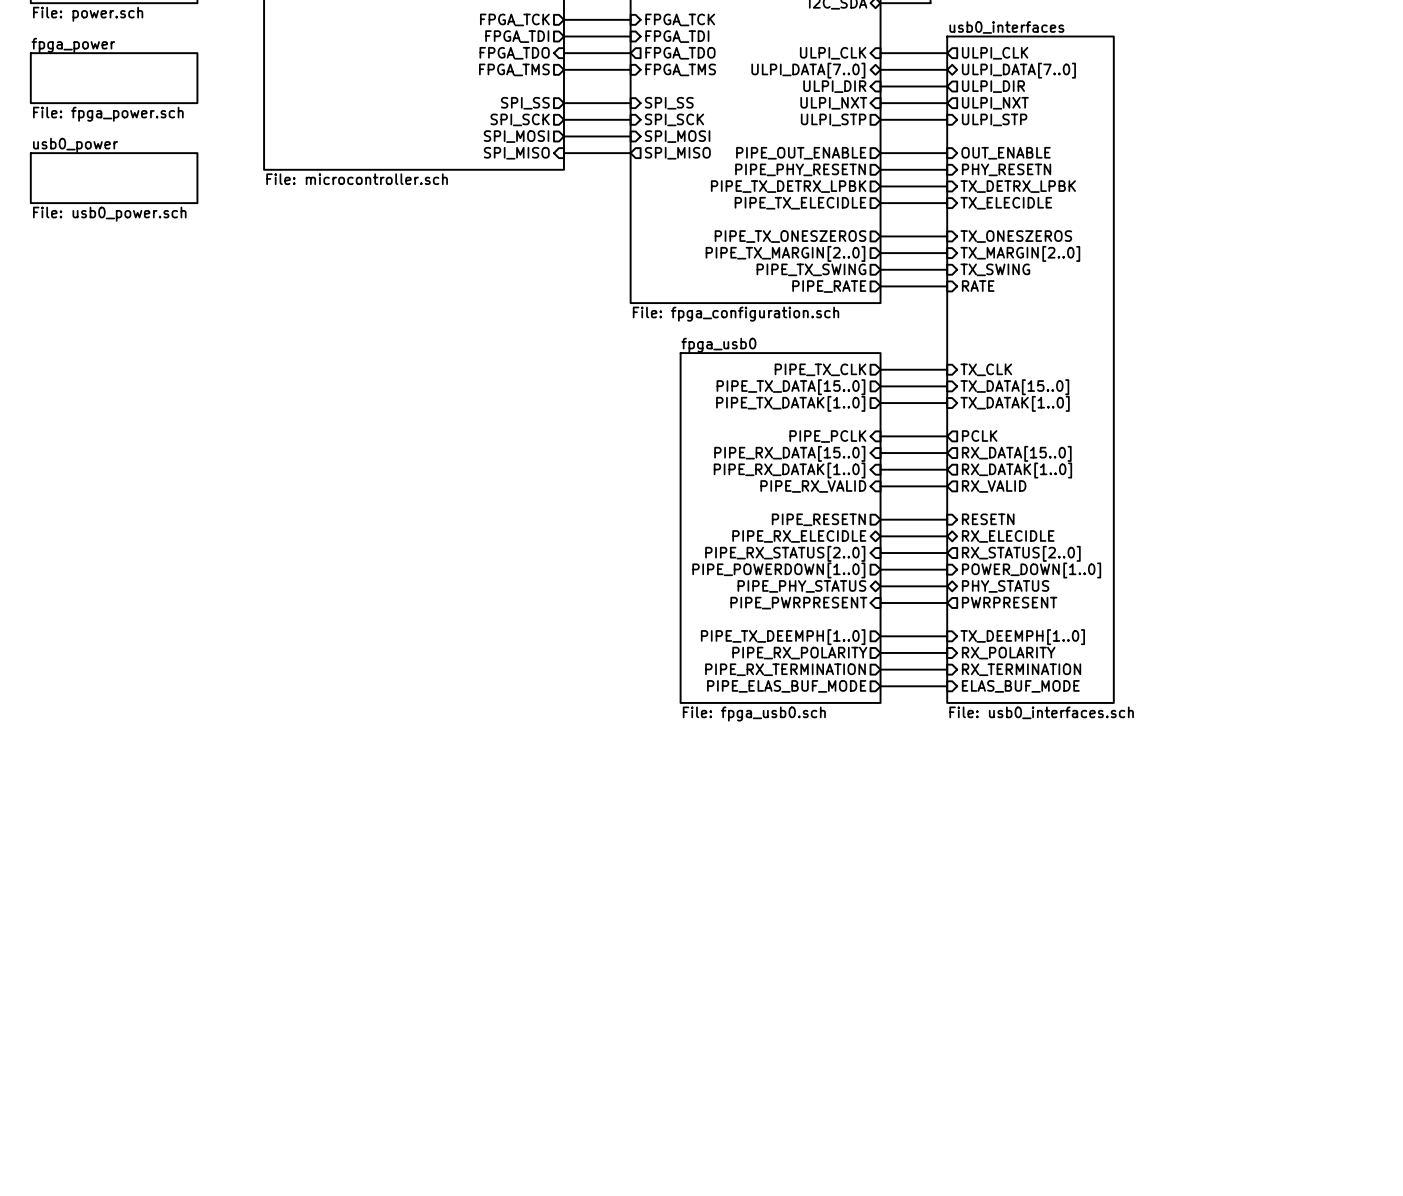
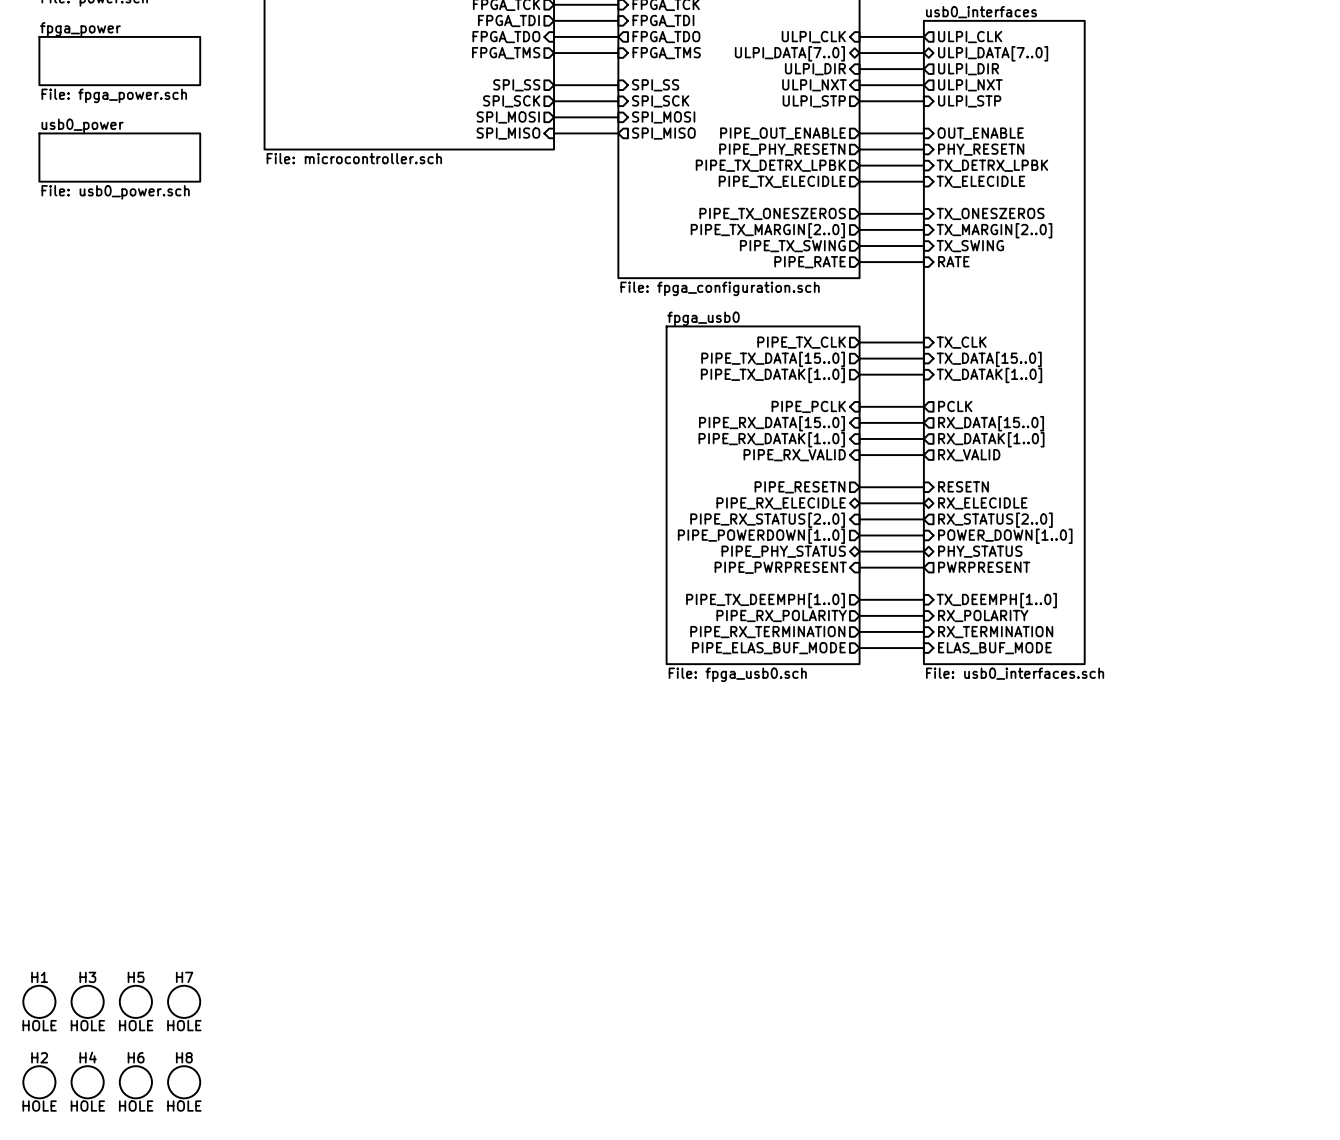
H1: none -> HOLE (39, 1001)
H3: none -> HOLE (87, 1001)
H5: none -> HOLE (135, 1001)
H7: none -> HOLE (184, 1001)
H2: none -> HOLE (39, 1082)
H4: none -> HOLE (87, 1082)
H6: none -> HOLE (135, 1082)
H8: none -> HOLE (184, 1082)

